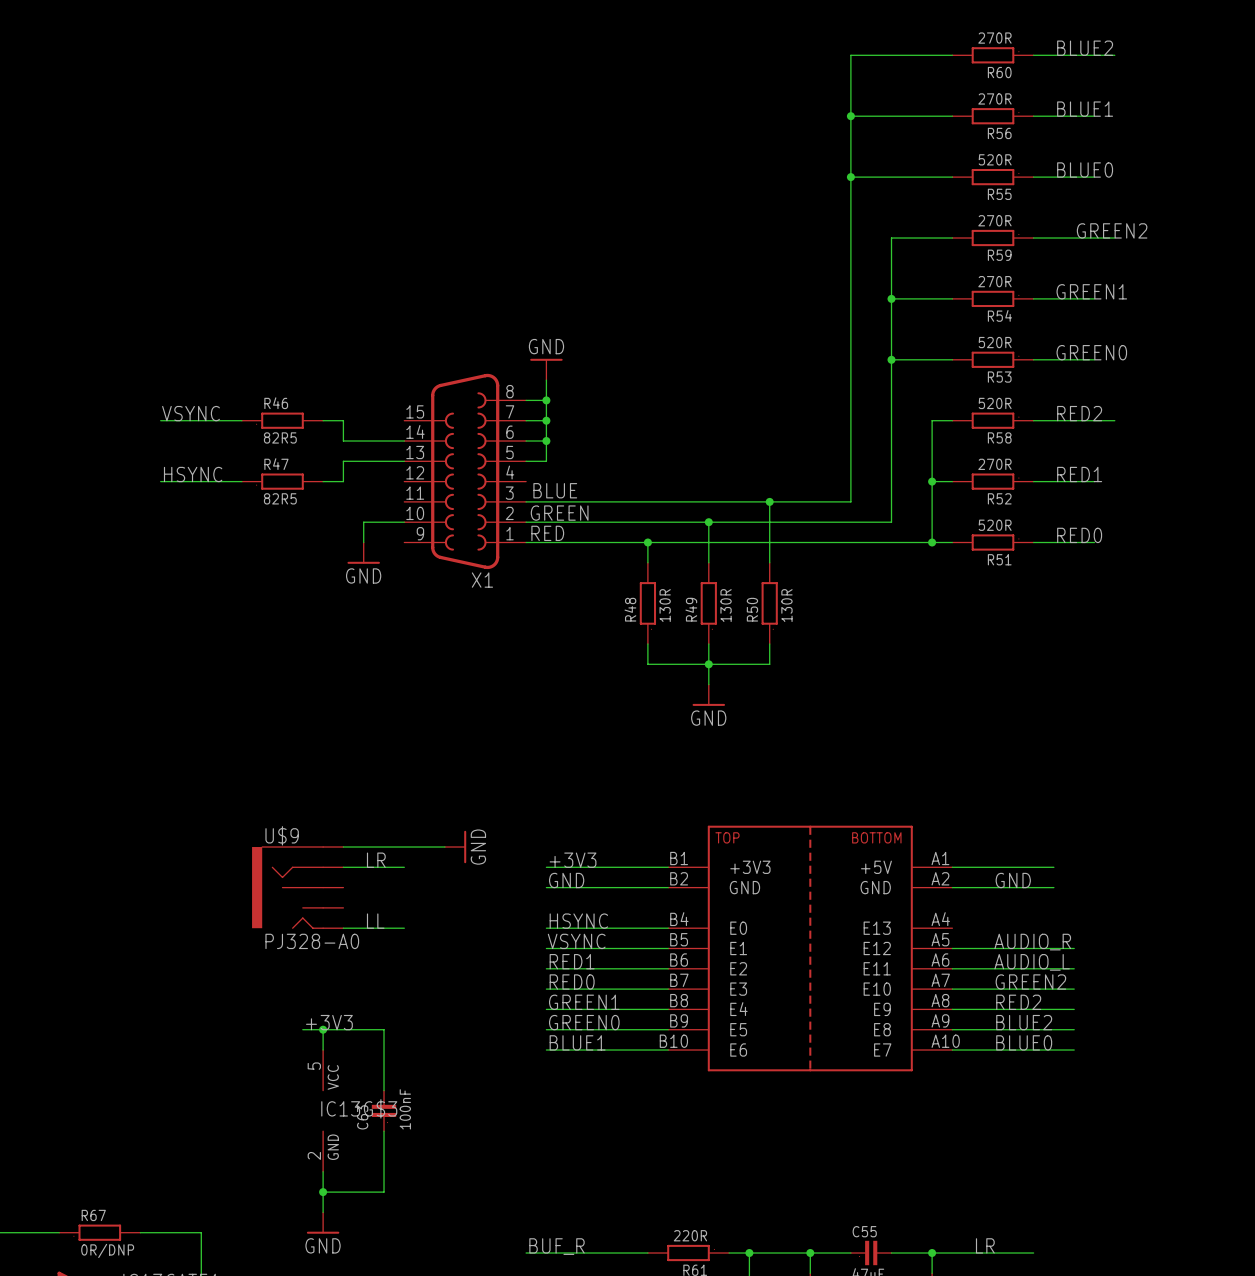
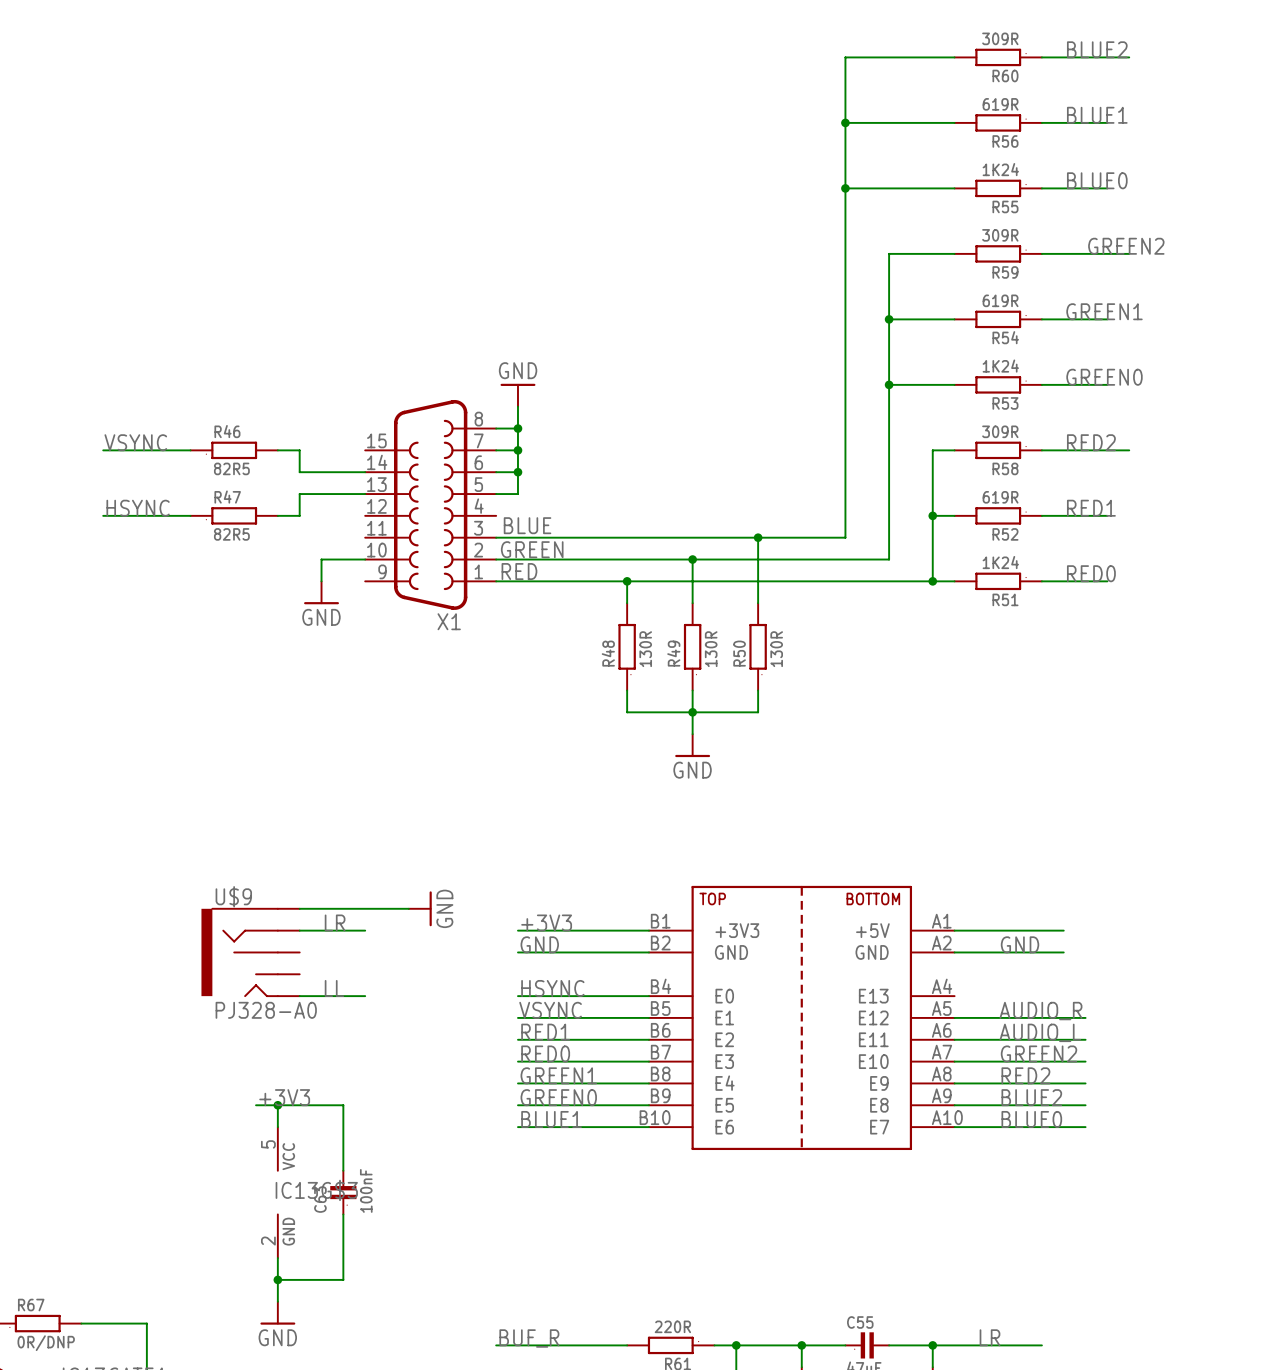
R60 value: 270R (994, 38) -> 309R (1000, 38)
R56 value: 270R (994, 98) -> 619R (1000, 104)
R55 value: 520R (995, 159) -> 1K24 (1000, 169)
R59 value: 270R (994, 220) -> 309R (1000, 235)
R54 value: 270R (994, 281) -> 619R (1000, 300)
R53 value: 520R (995, 342) -> 1K24 (1000, 366)
R58 value: 520R (995, 403) -> 309R (1000, 431)
R52 value: 270R (994, 464) -> 619R (1000, 497)
R51 value: 520R (995, 525) -> 1K24 (1000, 562)

